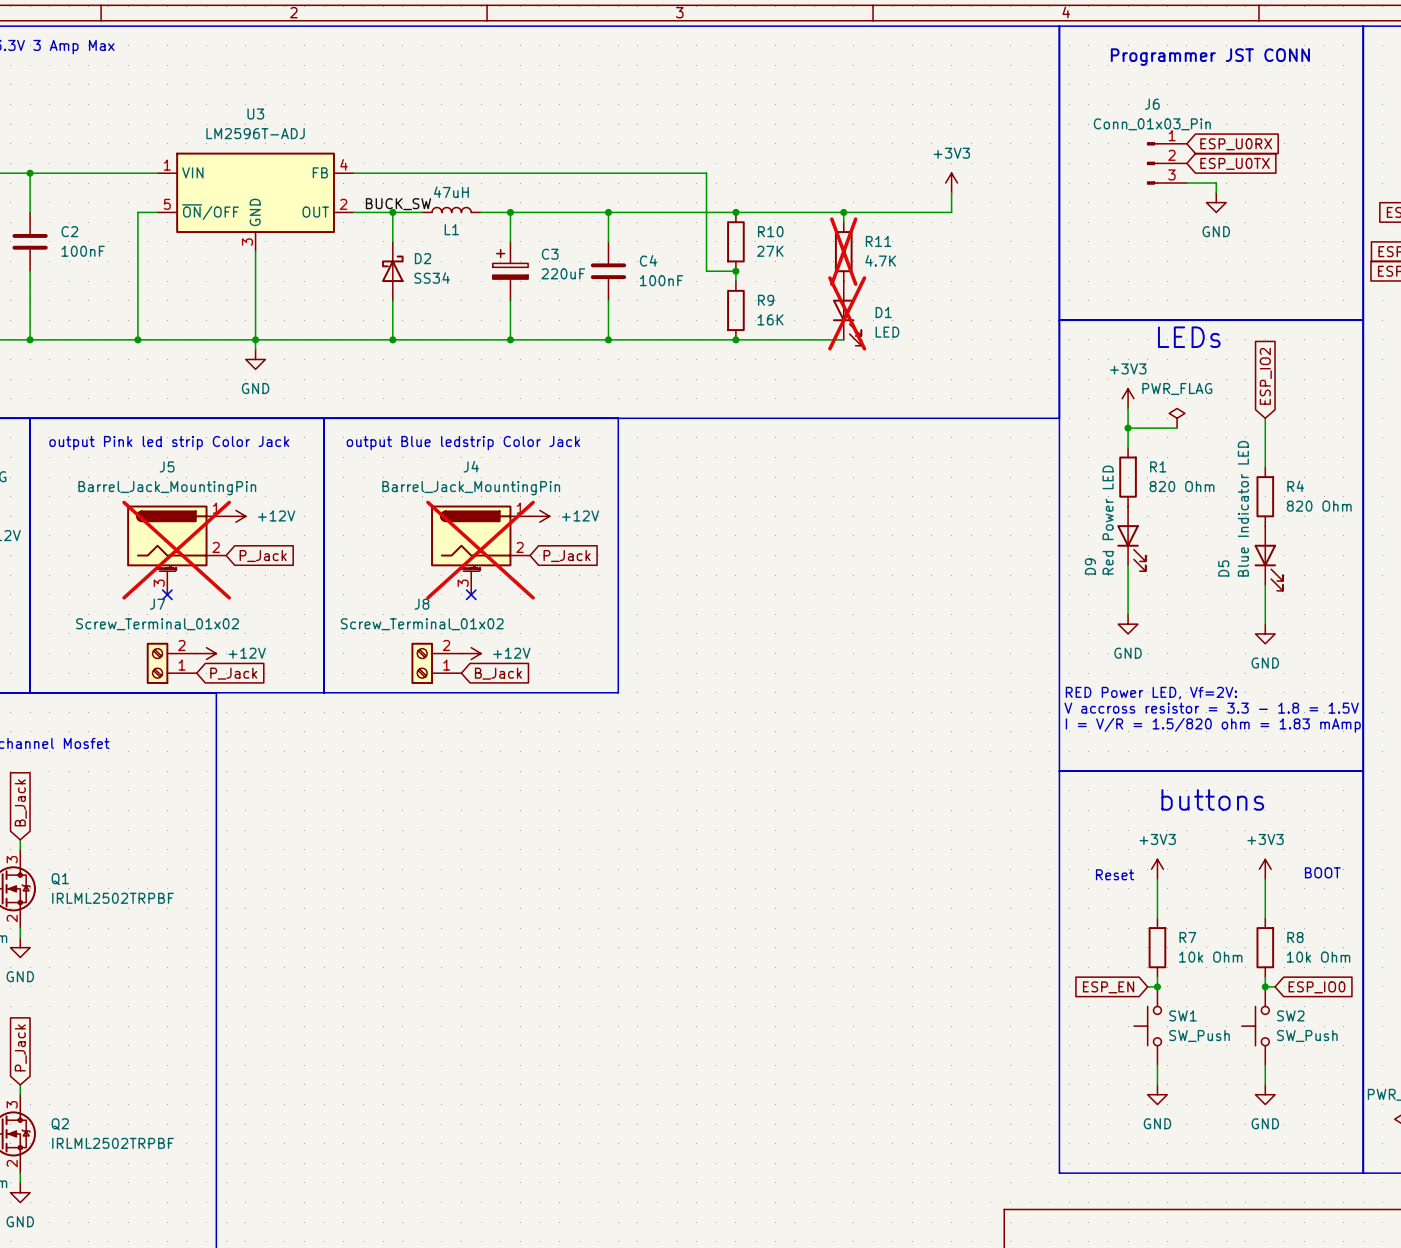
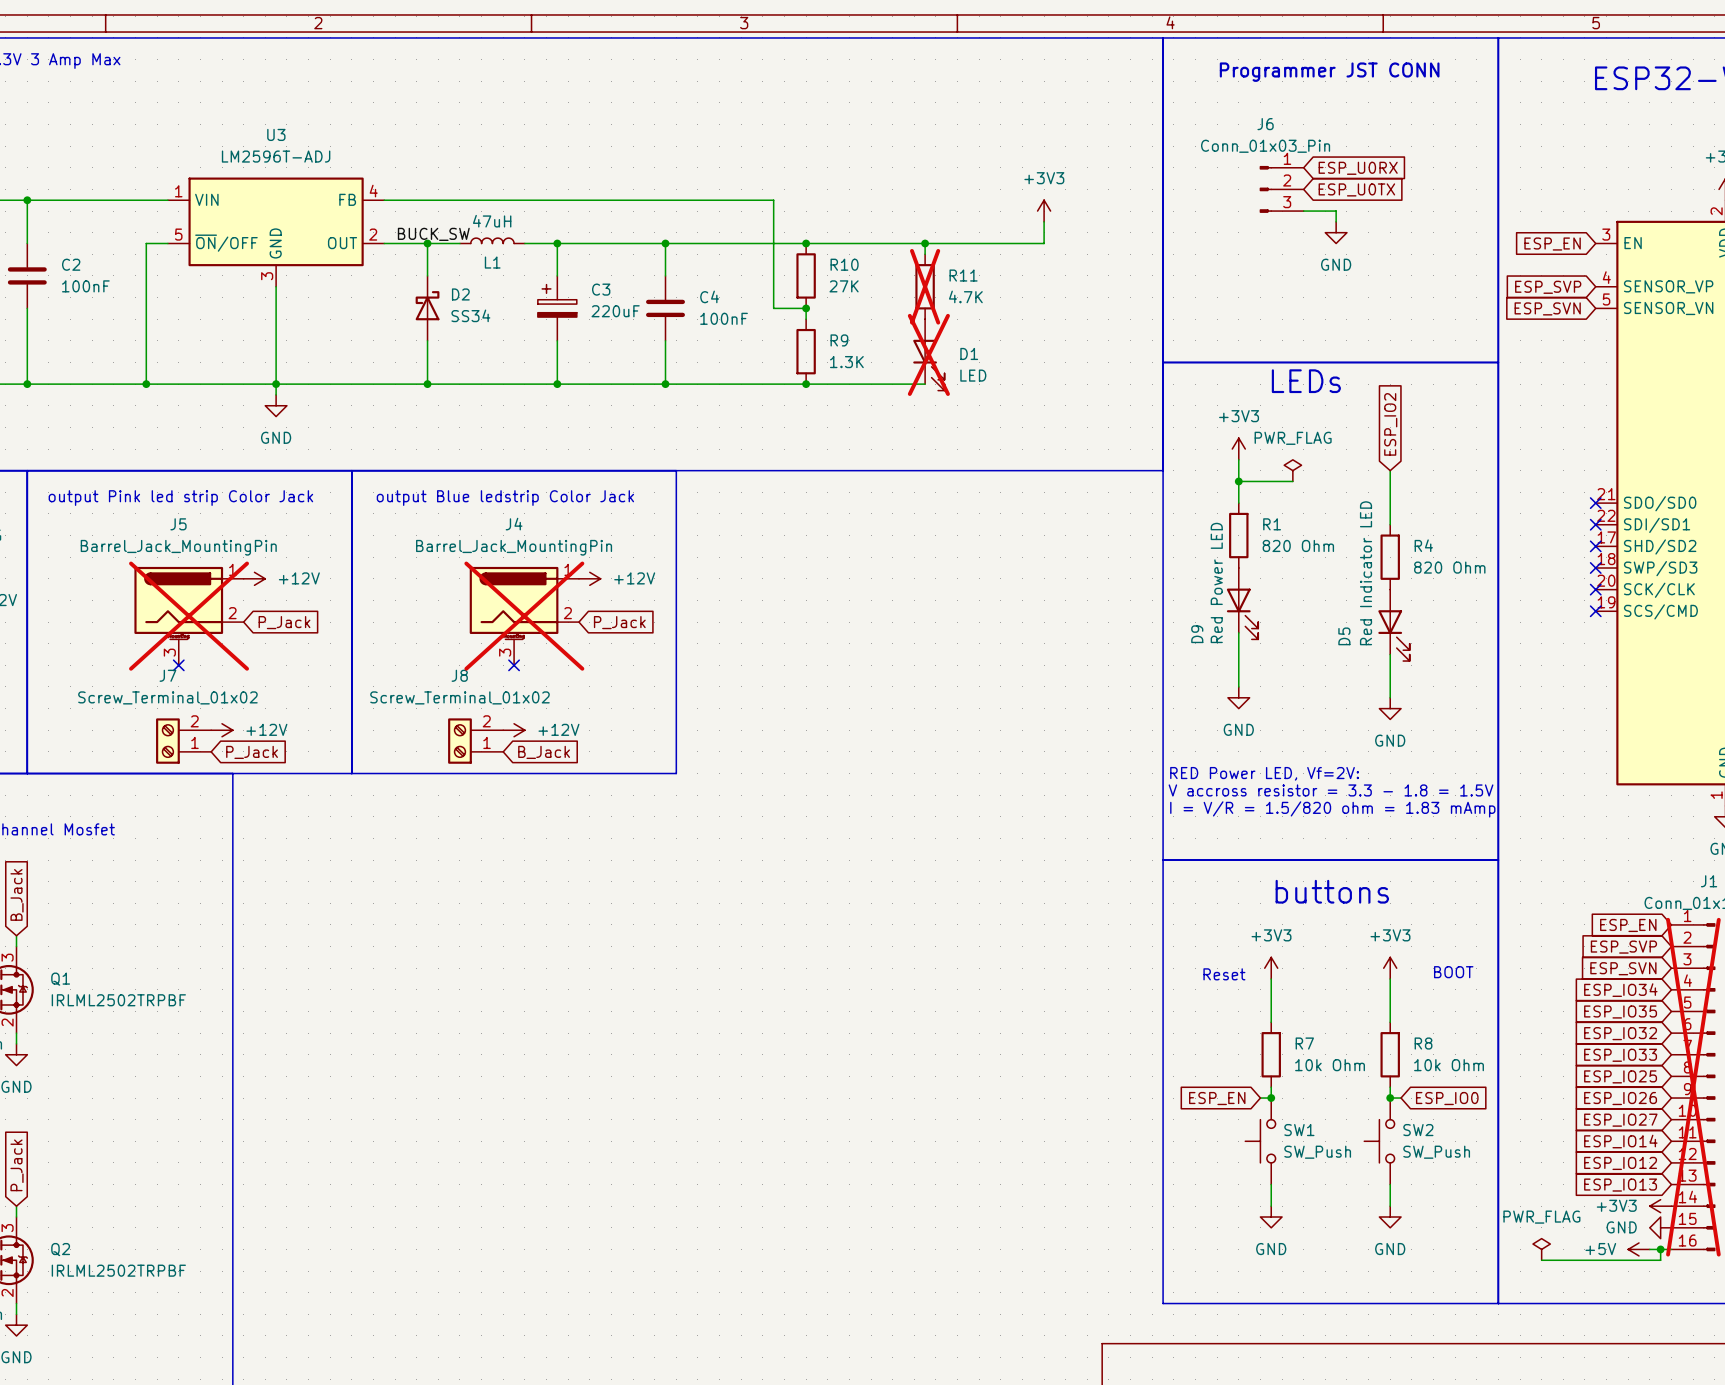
R9 value: 16K (770, 319) -> 1.3K (846, 362)
D5 value: Blue Indicator LED (1243, 508) -> Red Indicator LED (1366, 573)

